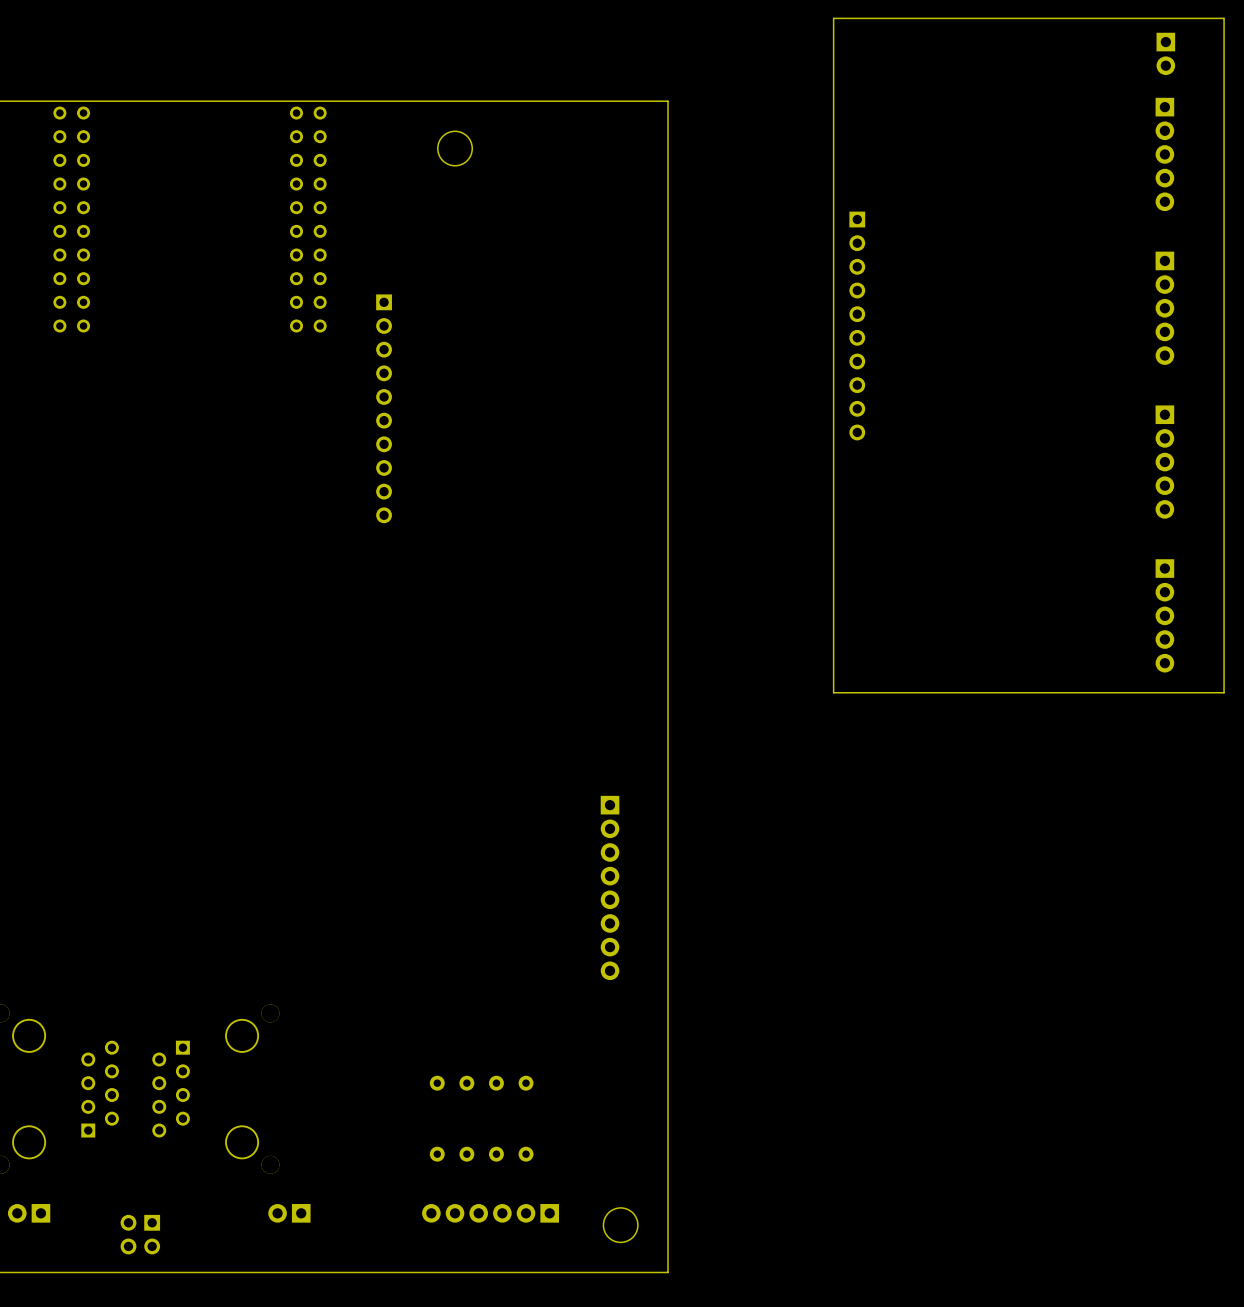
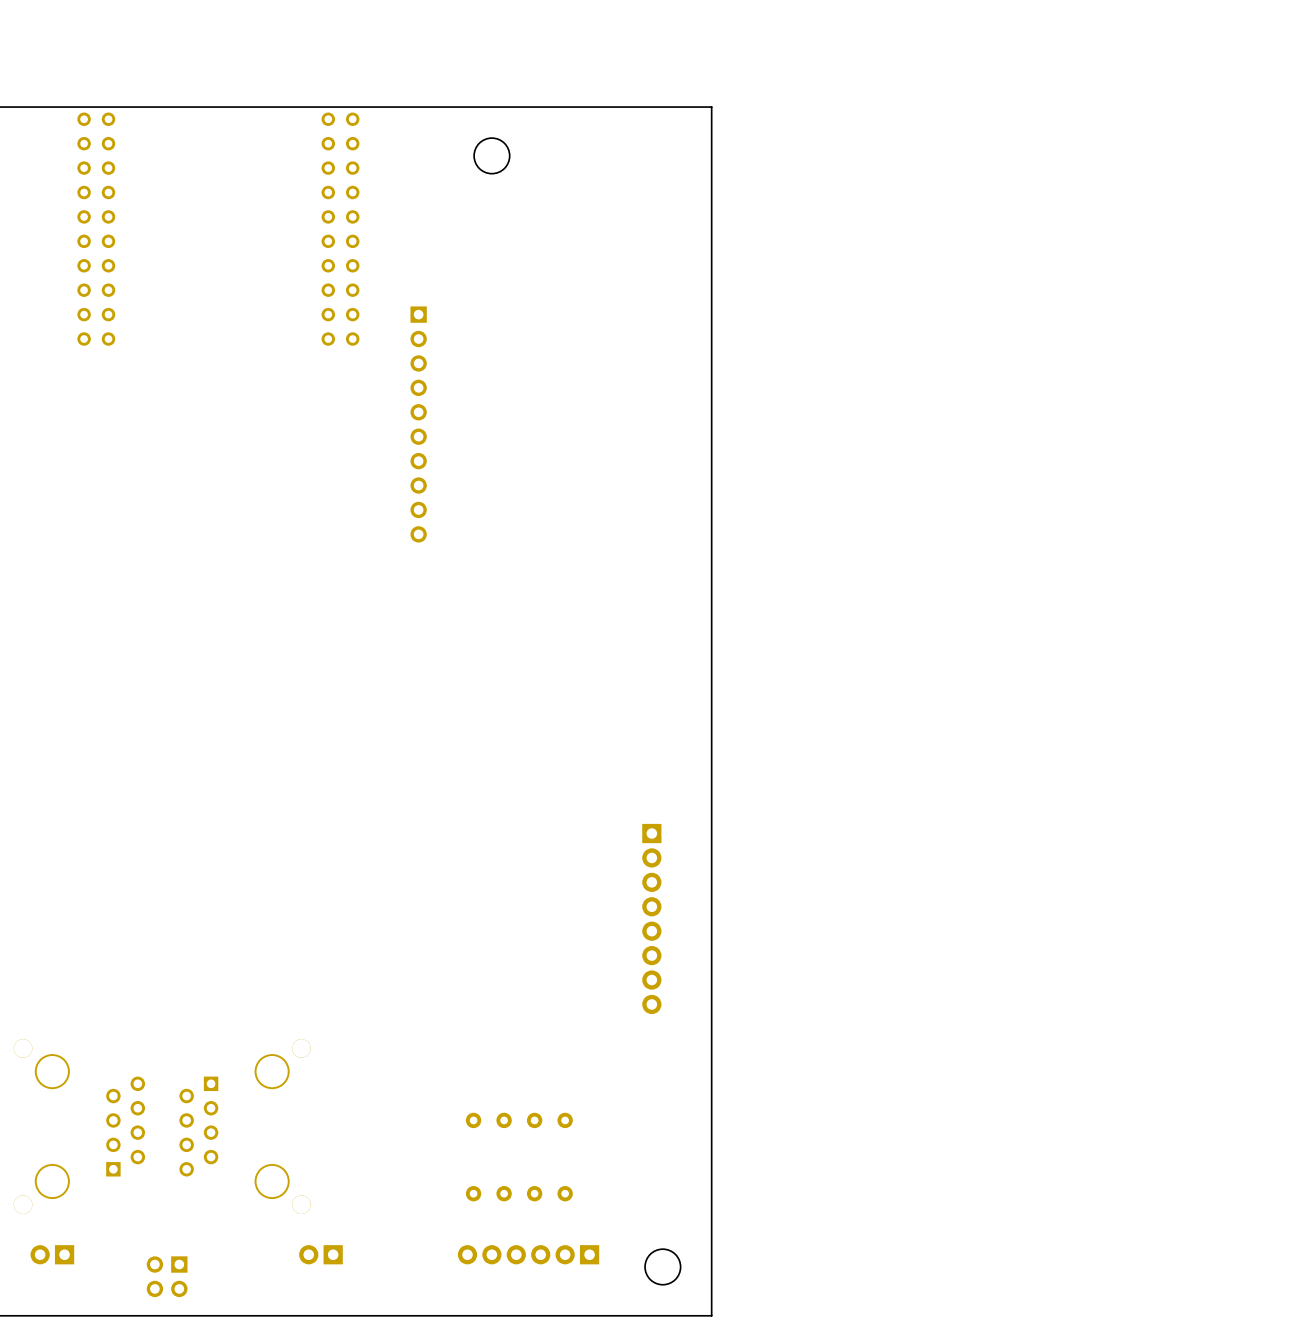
board edge: (1224, 18) (833, 18) (833, 692) (1224, 692) (1224, 18) -> none
part: (1165, 53) -> none
part: (1164, 154) -> none
part: (1164, 308) -> none
part: (857, 326) -> none
part: (1164, 462) -> none
part: (1164, 615) -> none

